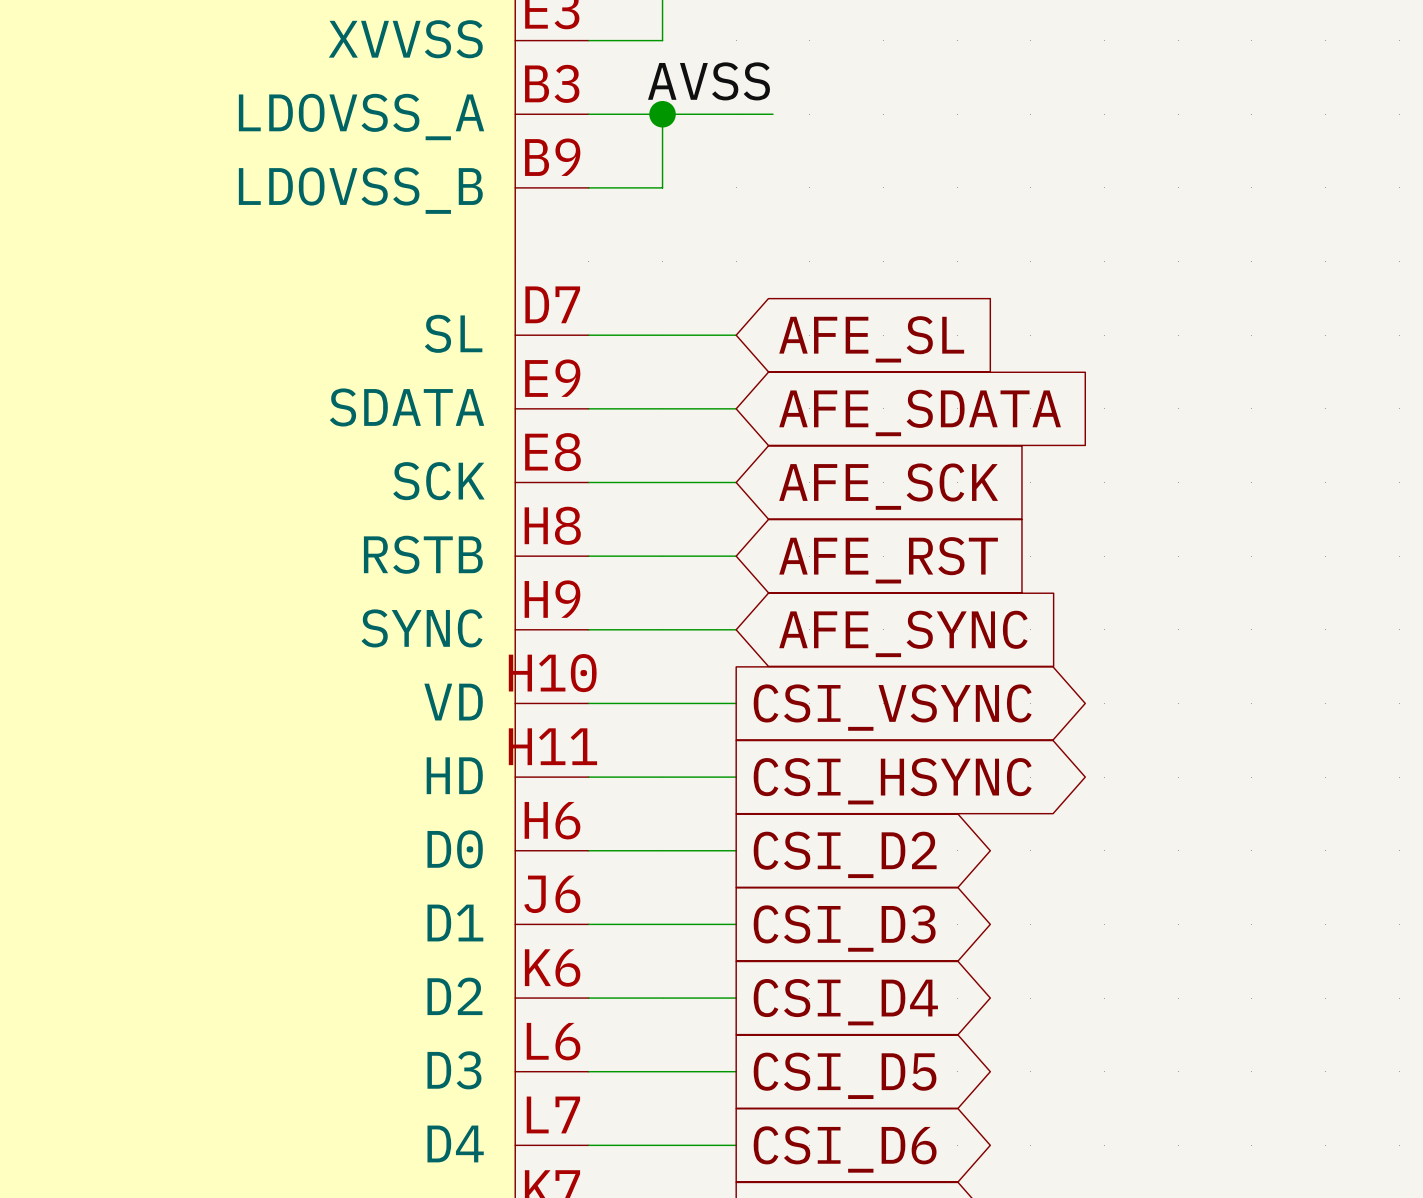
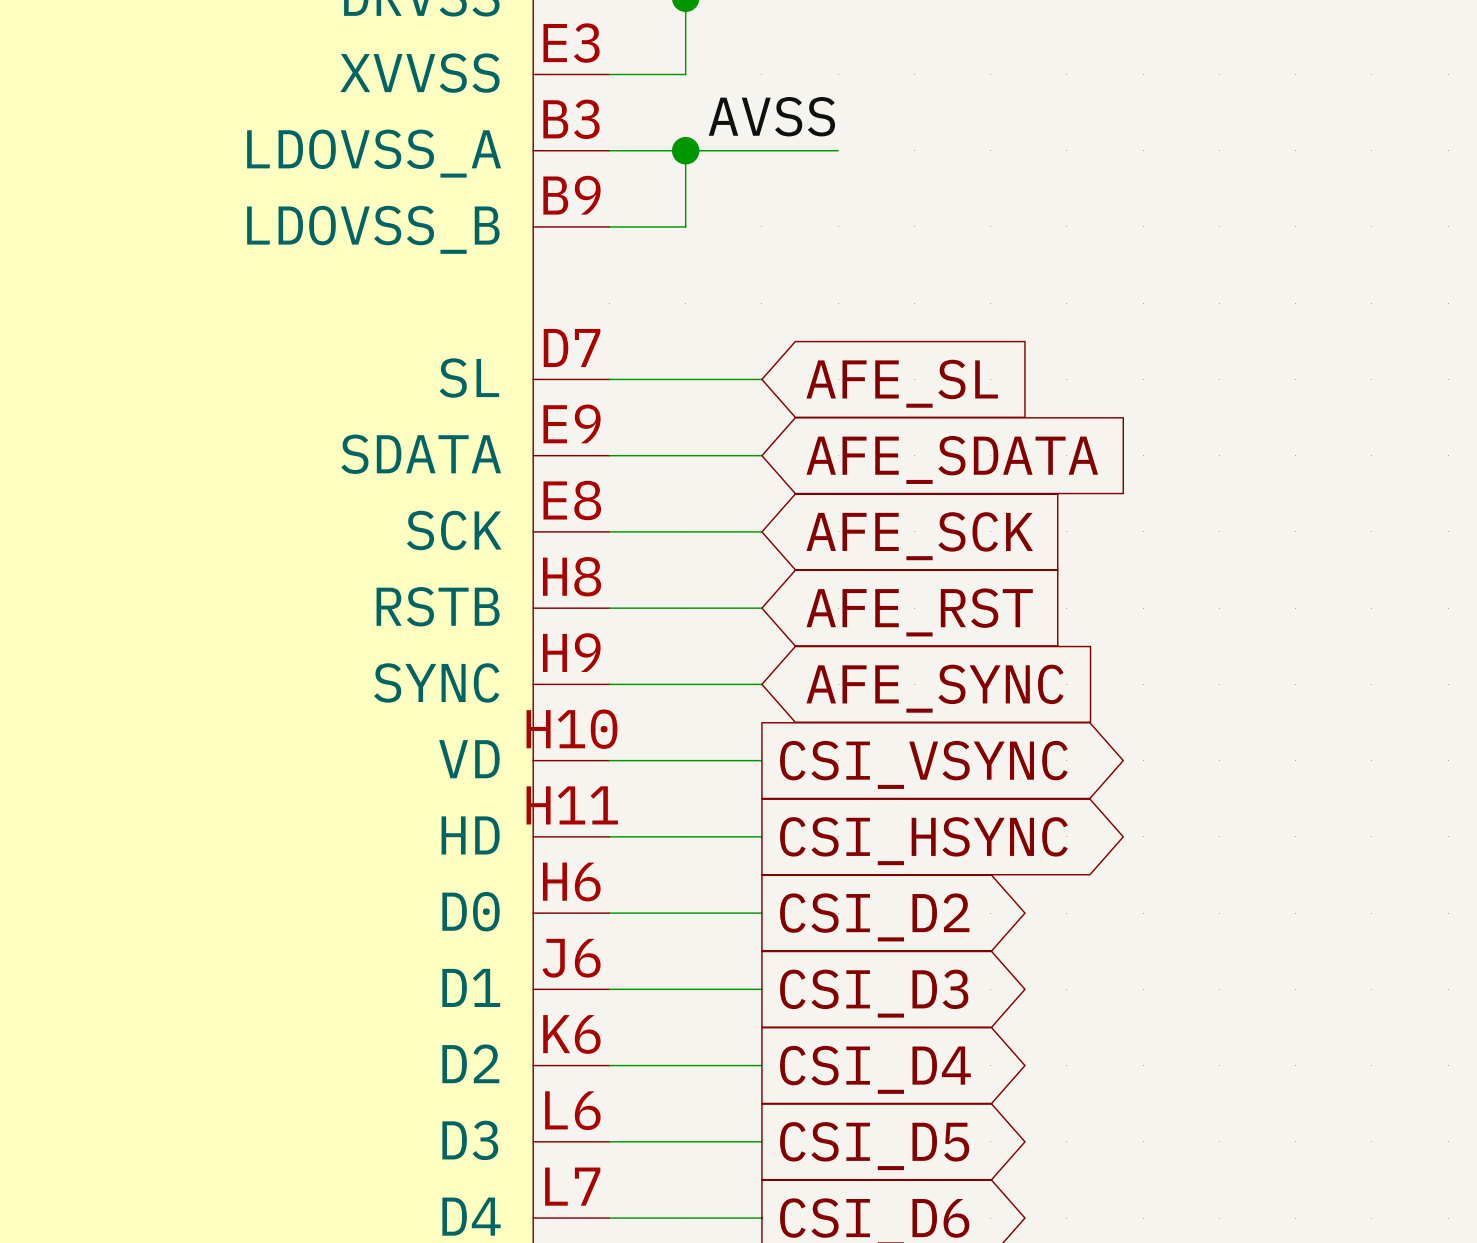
label position: AVSS (708, 81) -> AVSS (771, 116)
wire: none -> (800, 150) (838, 150)

